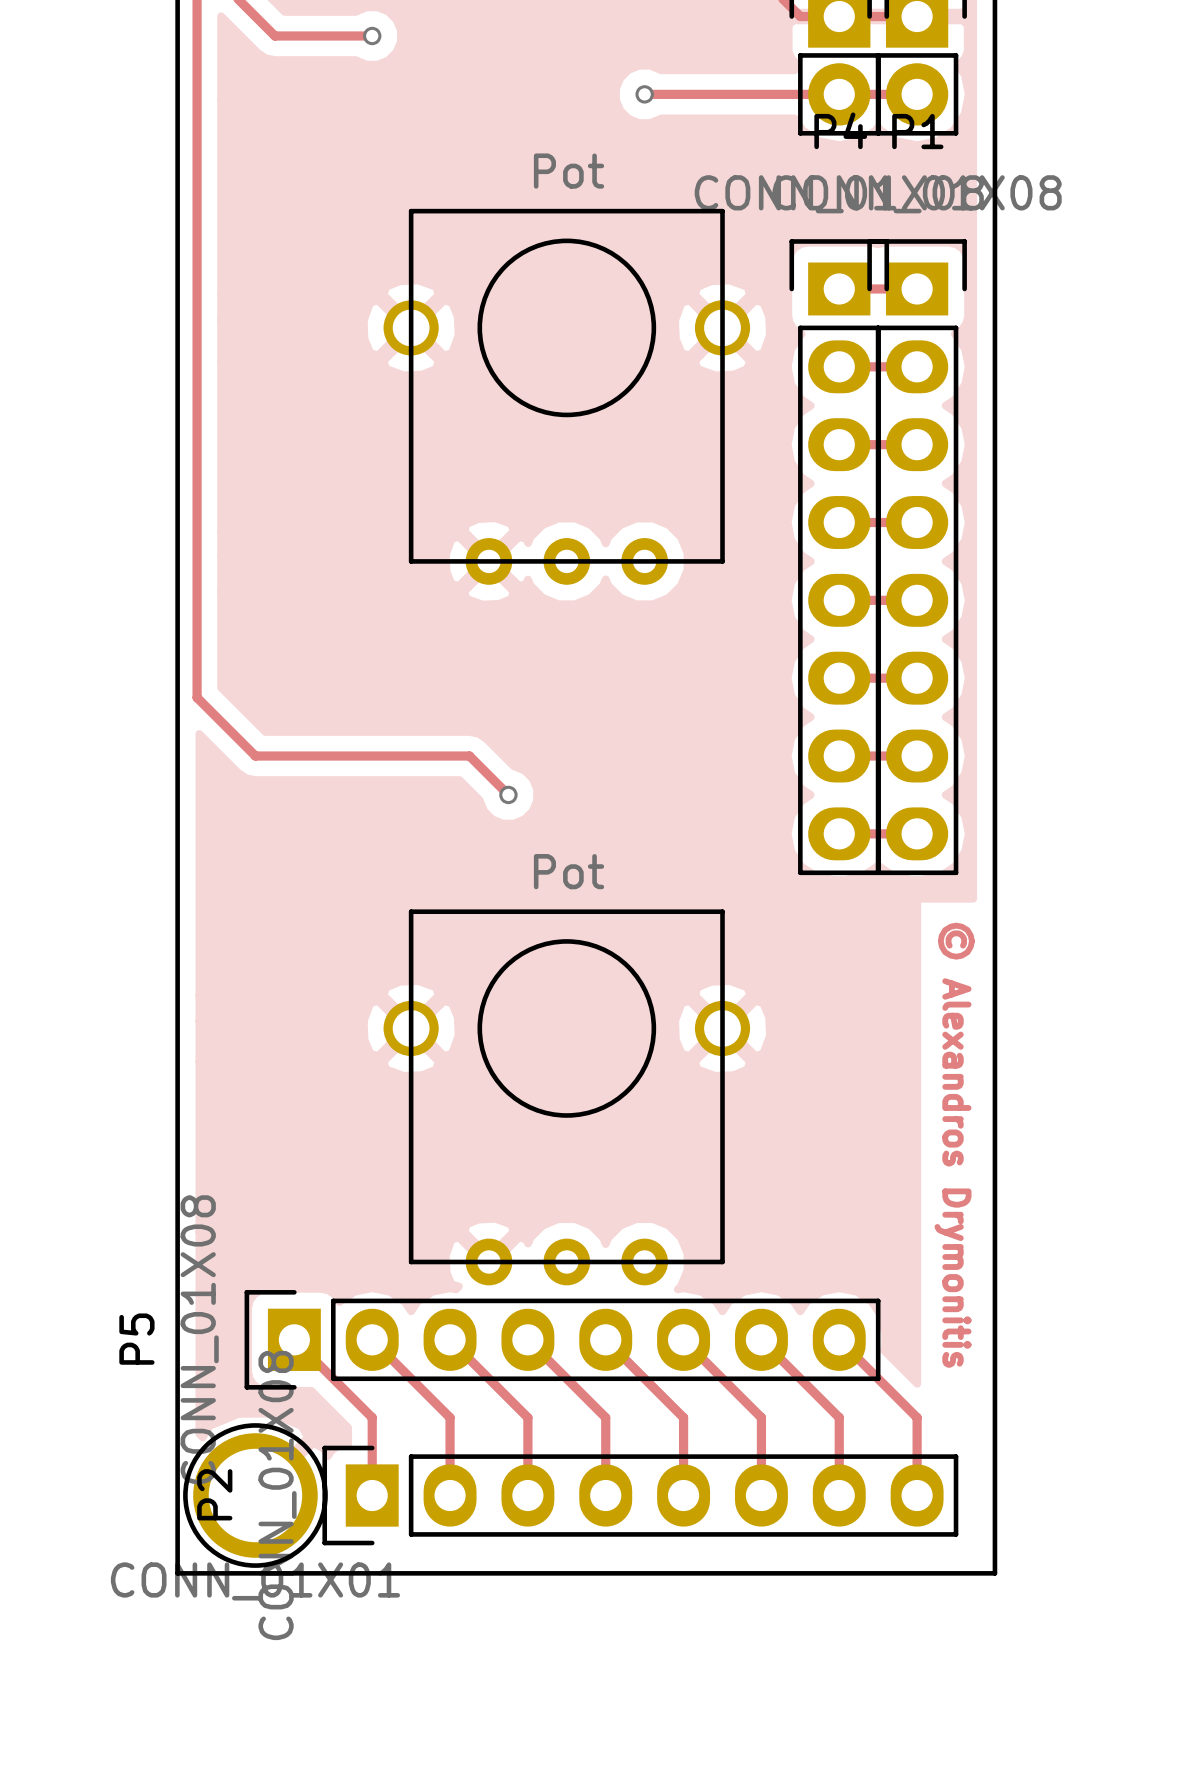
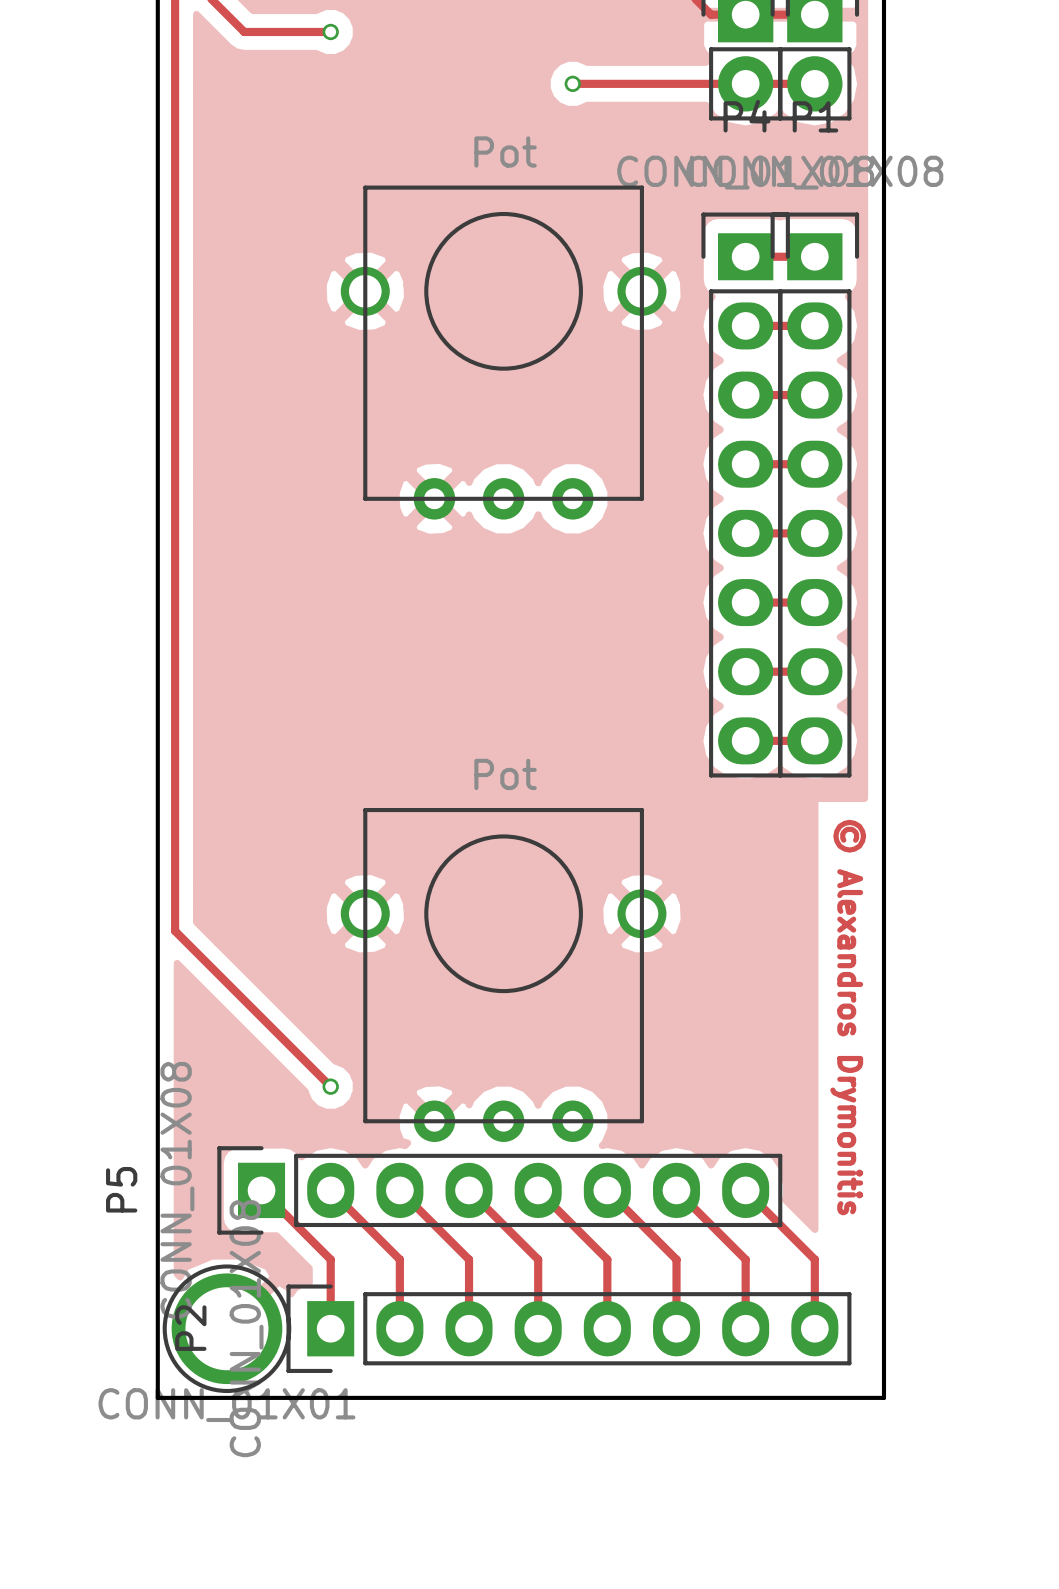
track: (197, 697) (255, 756) (469, 756) (508, 794) -> (175, 619) (175, 931) (330, 1086)
via: (508, 794) -> none
via: none -> (330, 1086)

